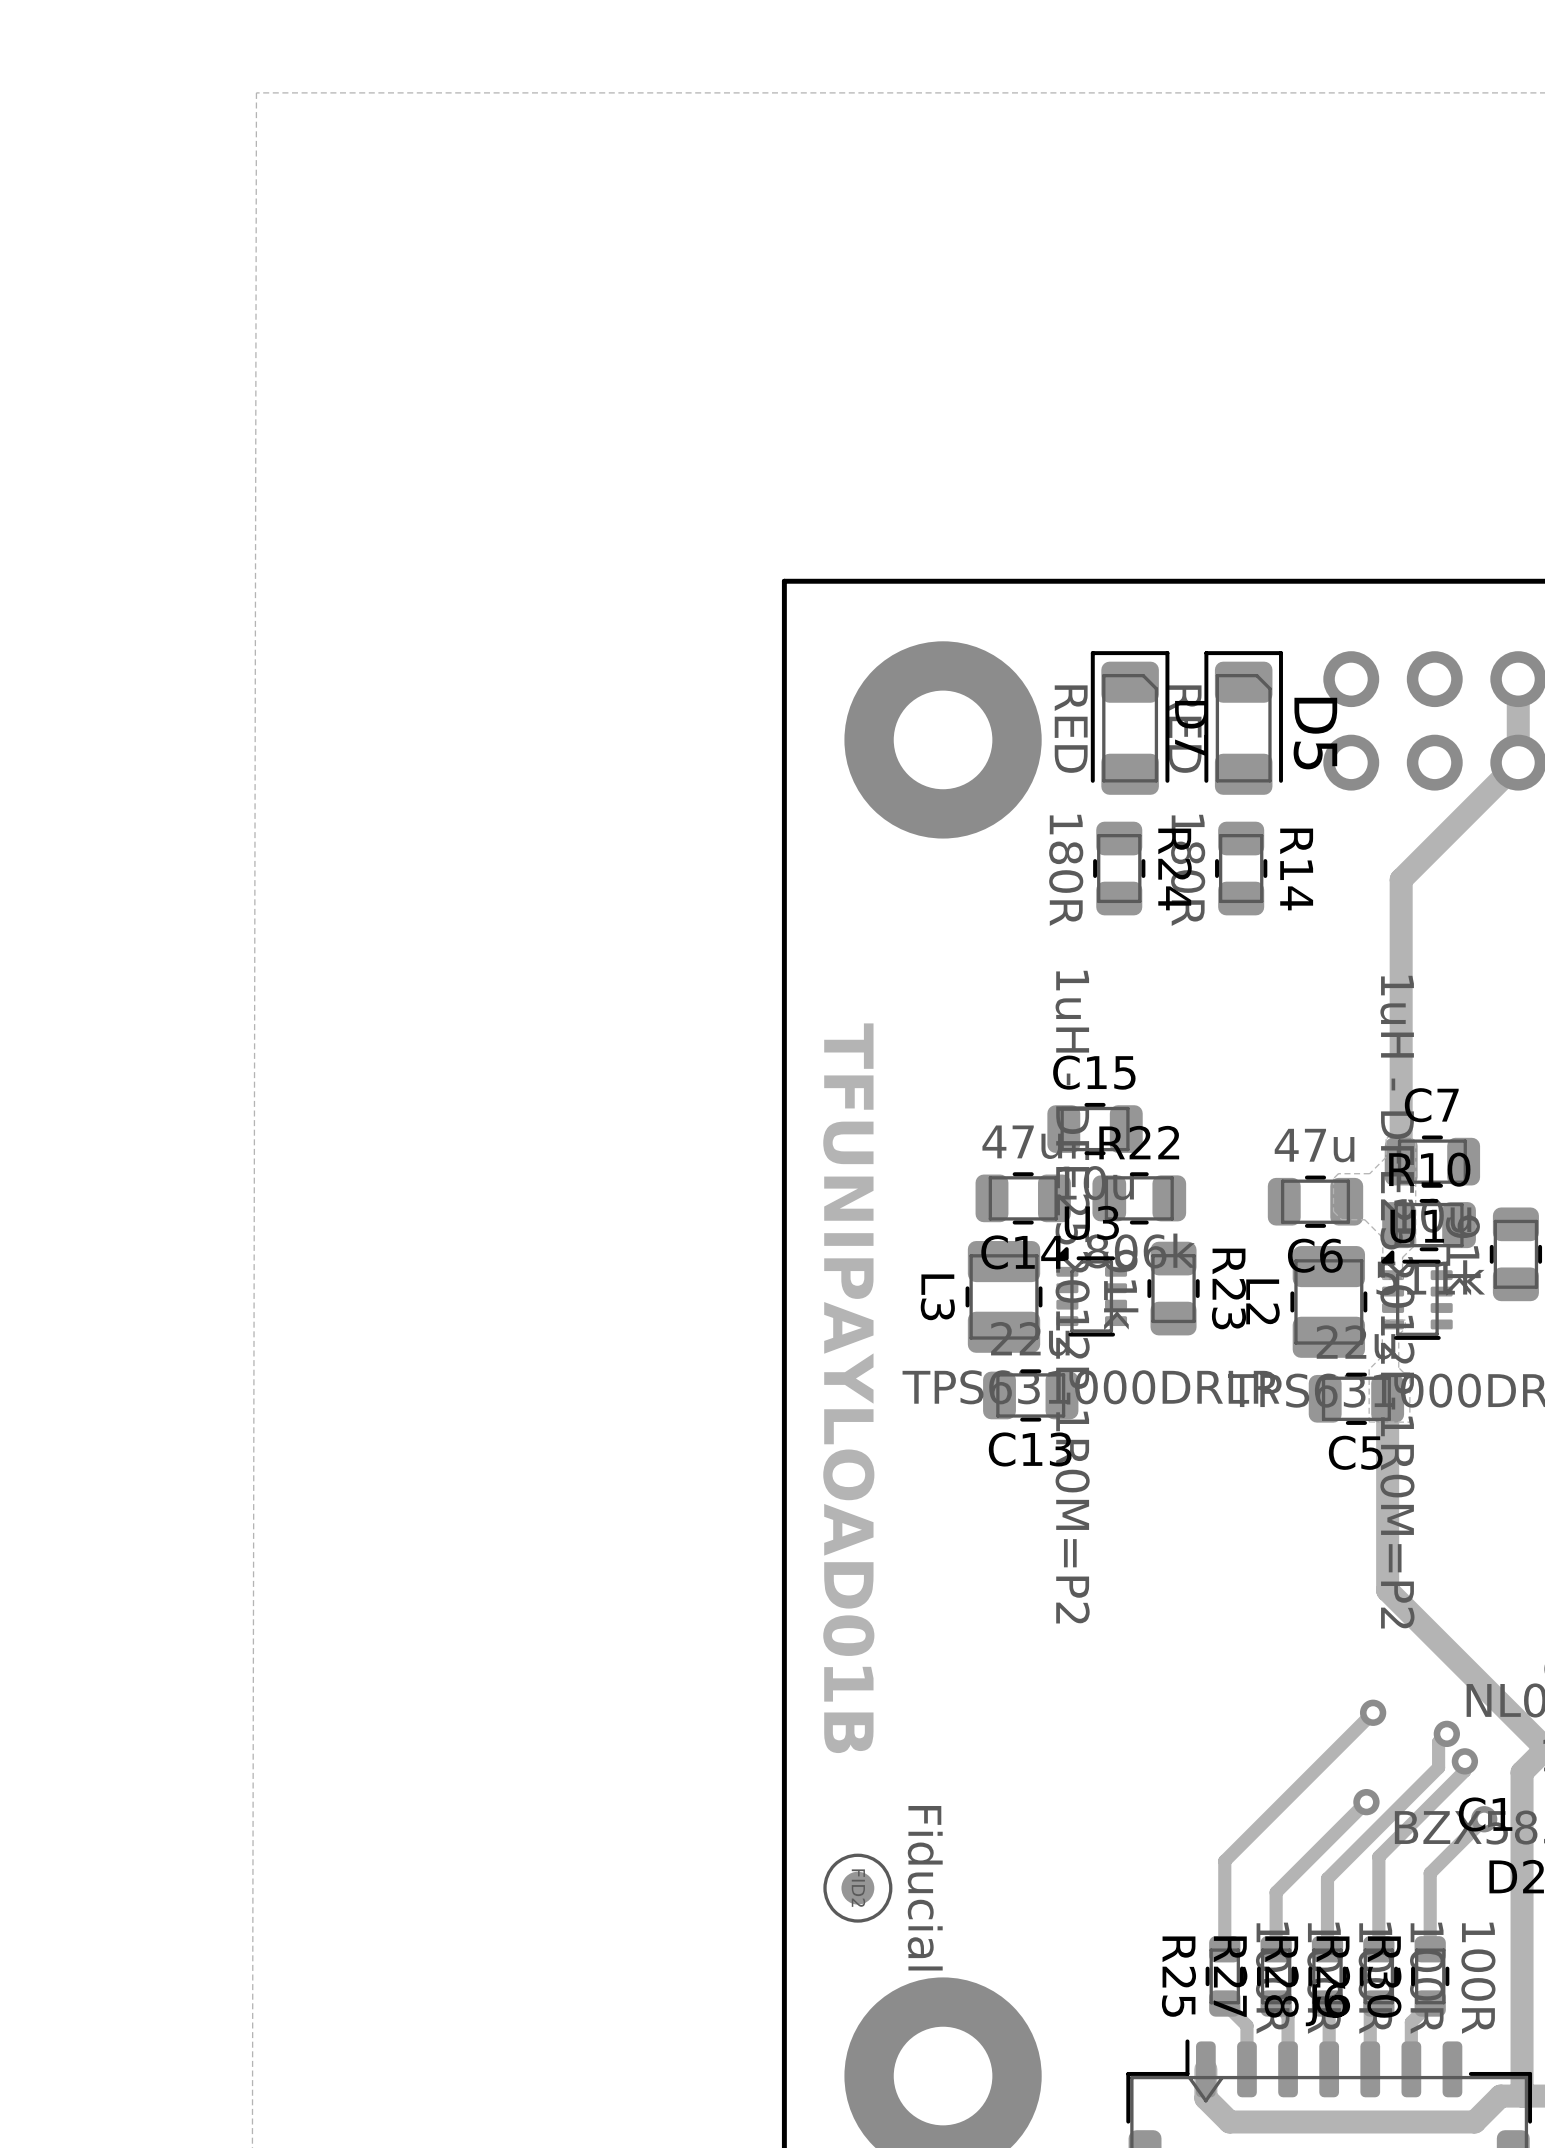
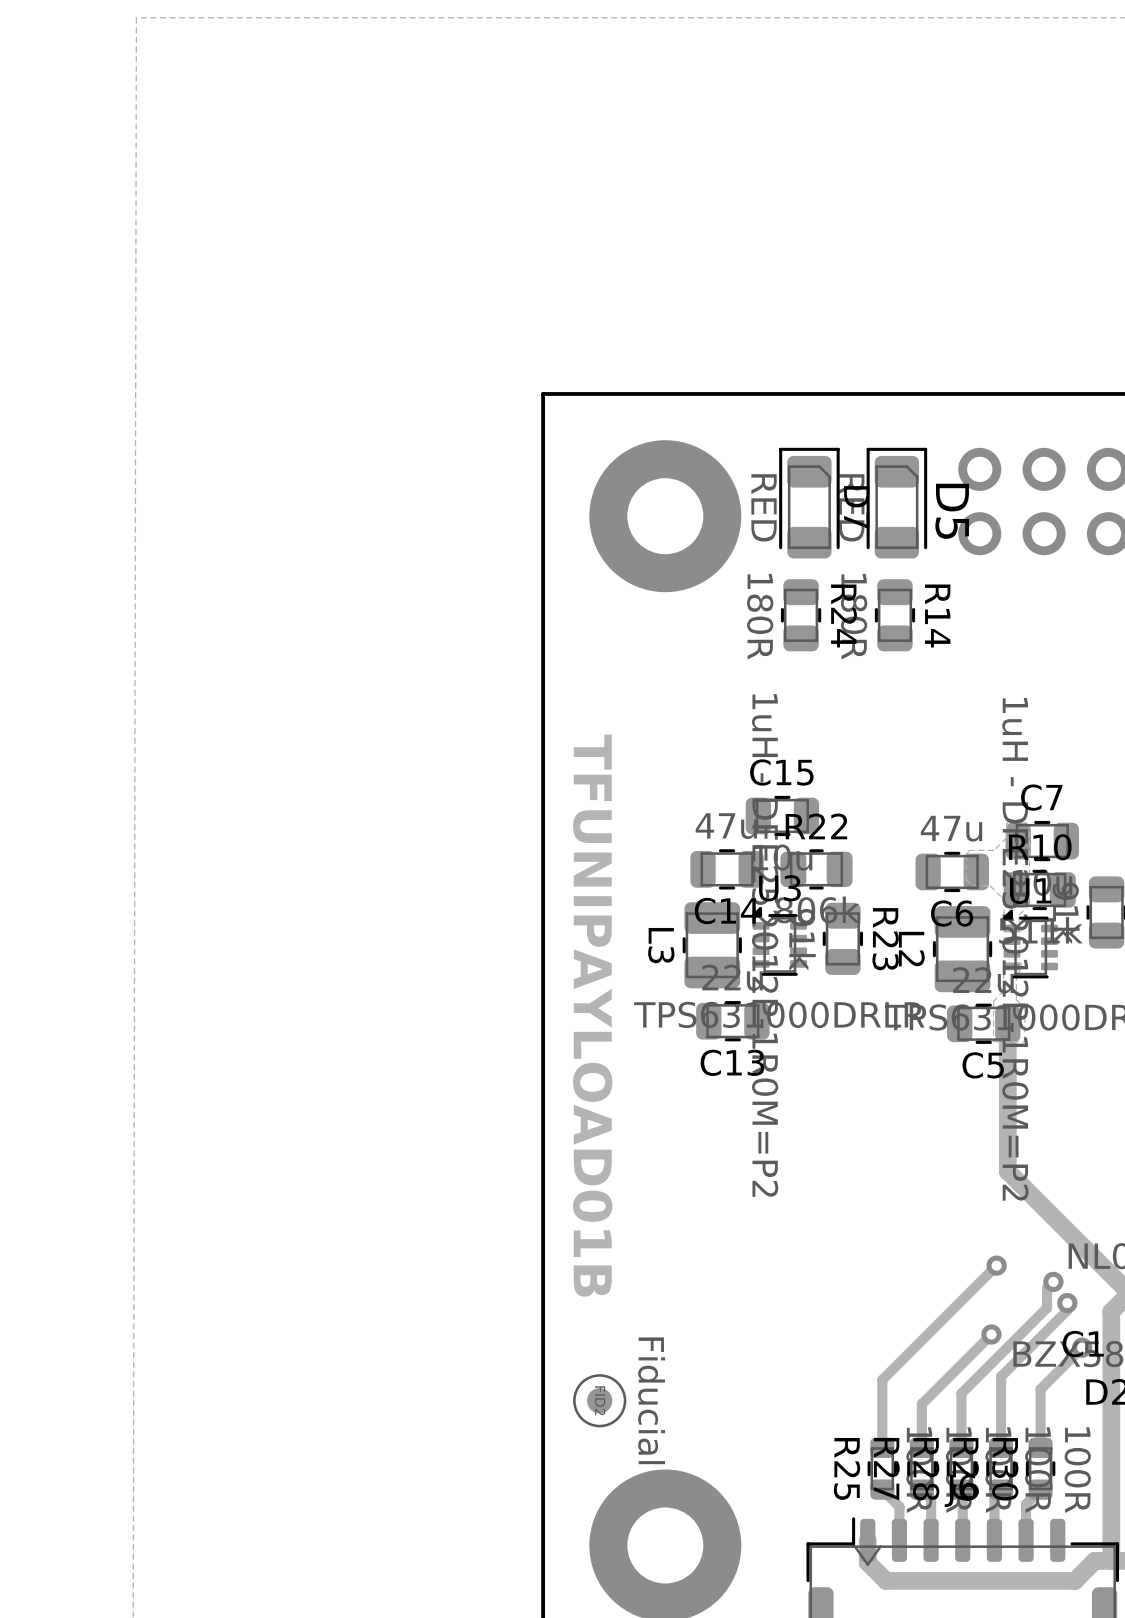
track: (1518, 679) (1518, 762) (1401, 879) (1401, 1161) -> none

